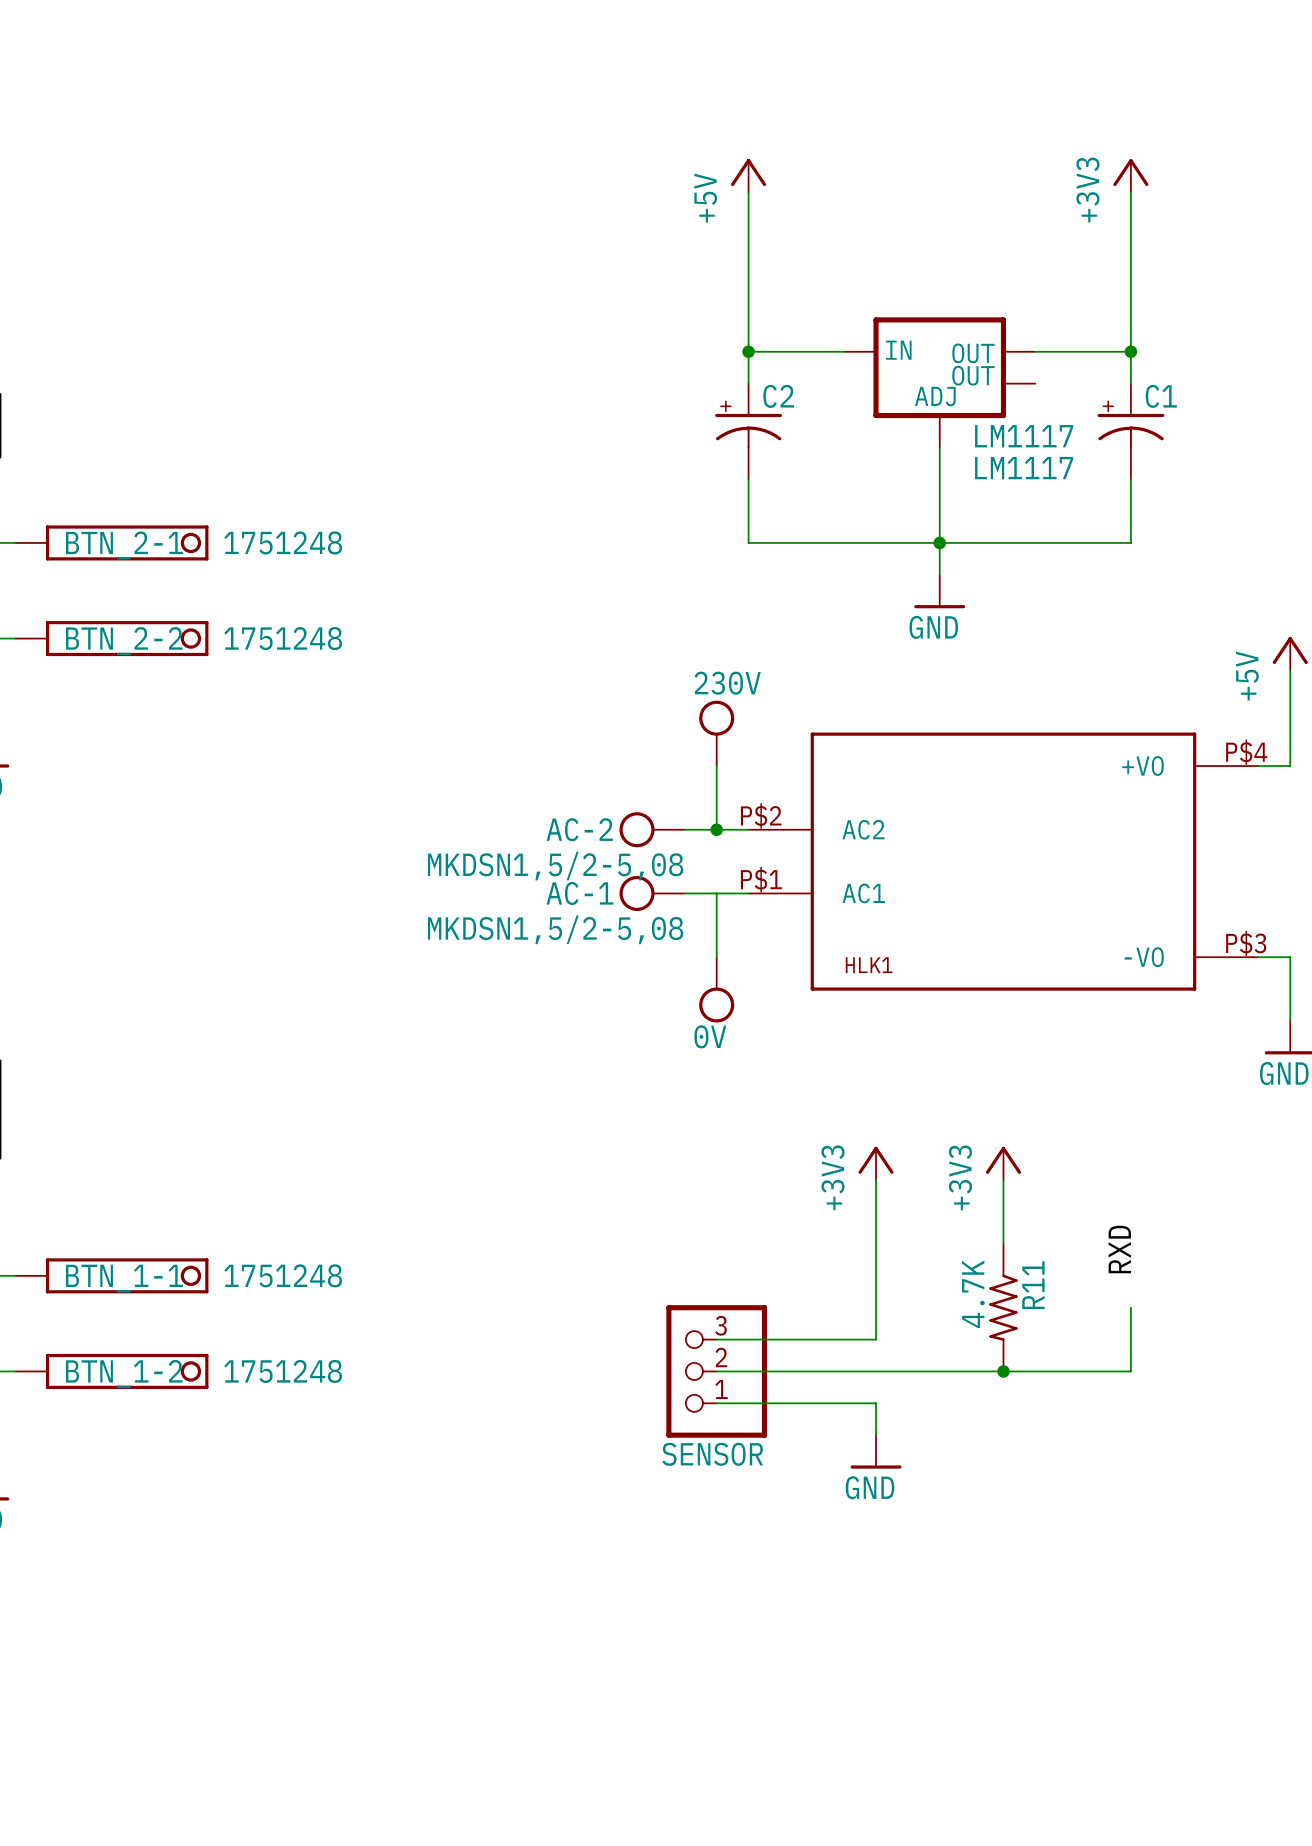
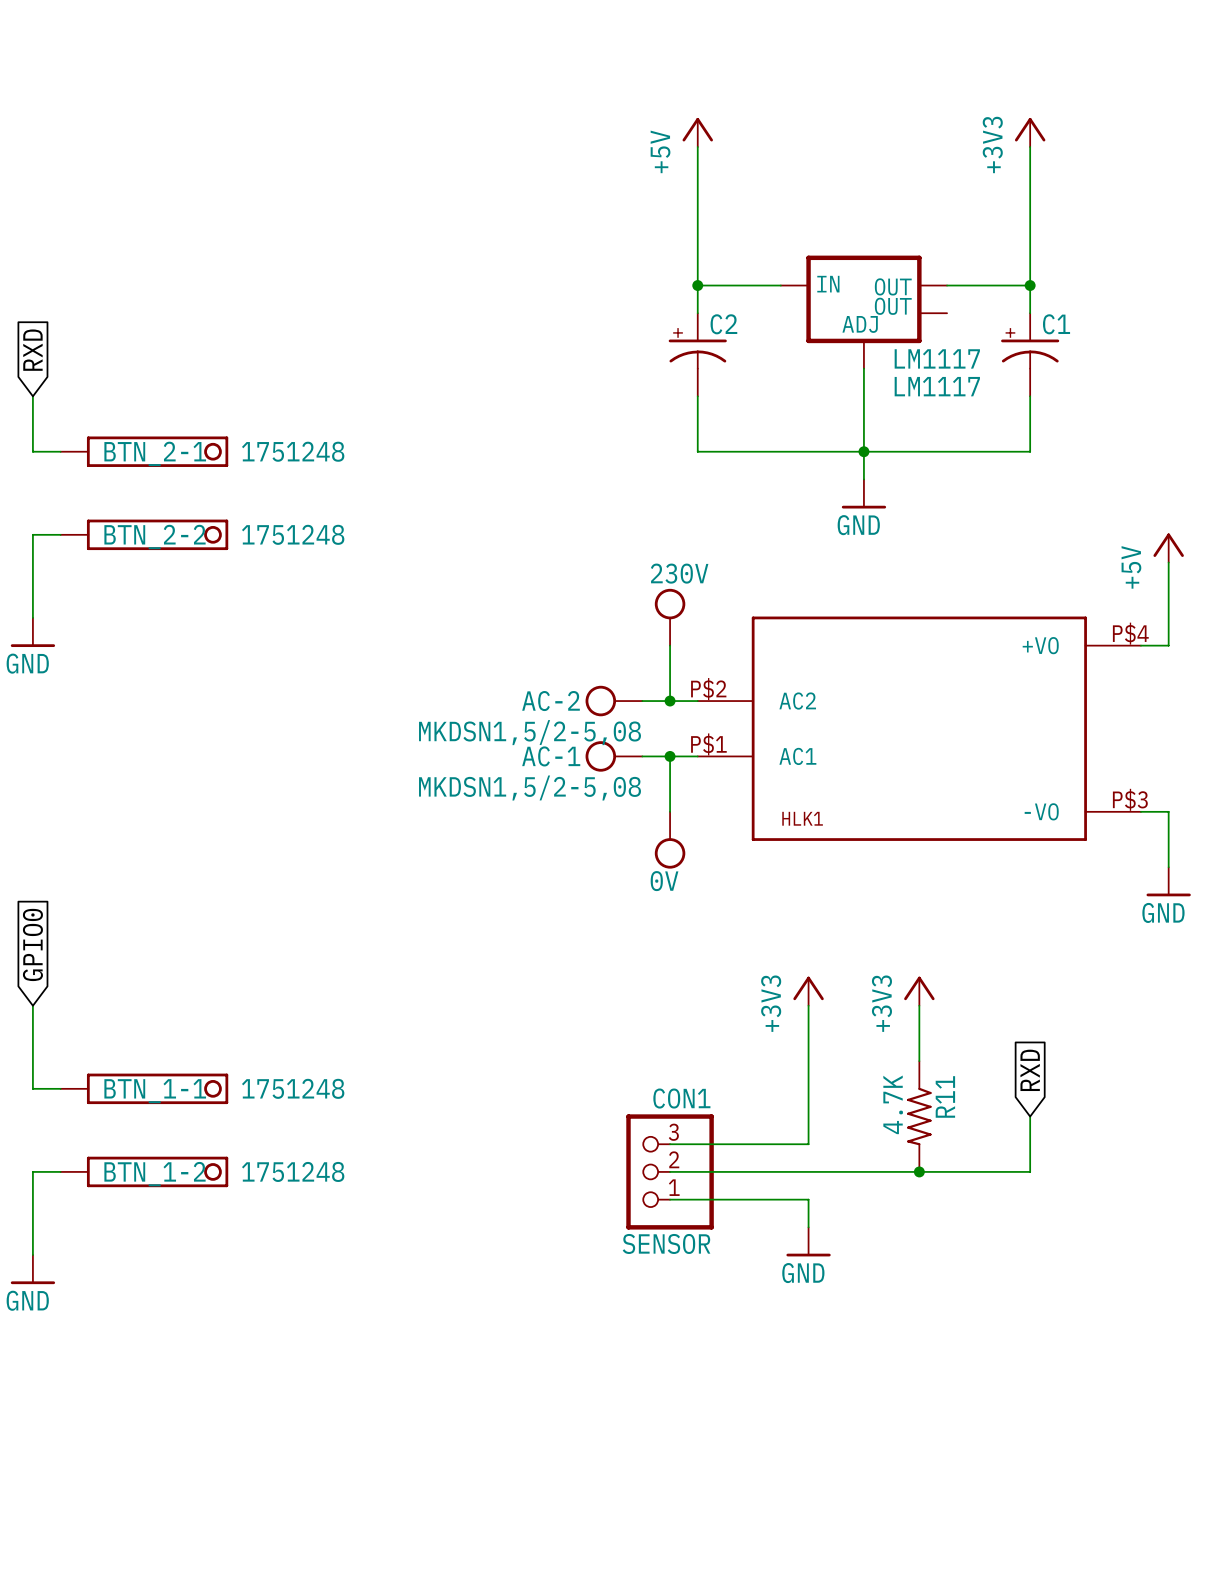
junction: none -> (670, 756)
label: RXD (1119, 1249) -> none
global label: none -> RXD (1030, 1070)
SENSOR value: none -> CON1 (681, 1098)

